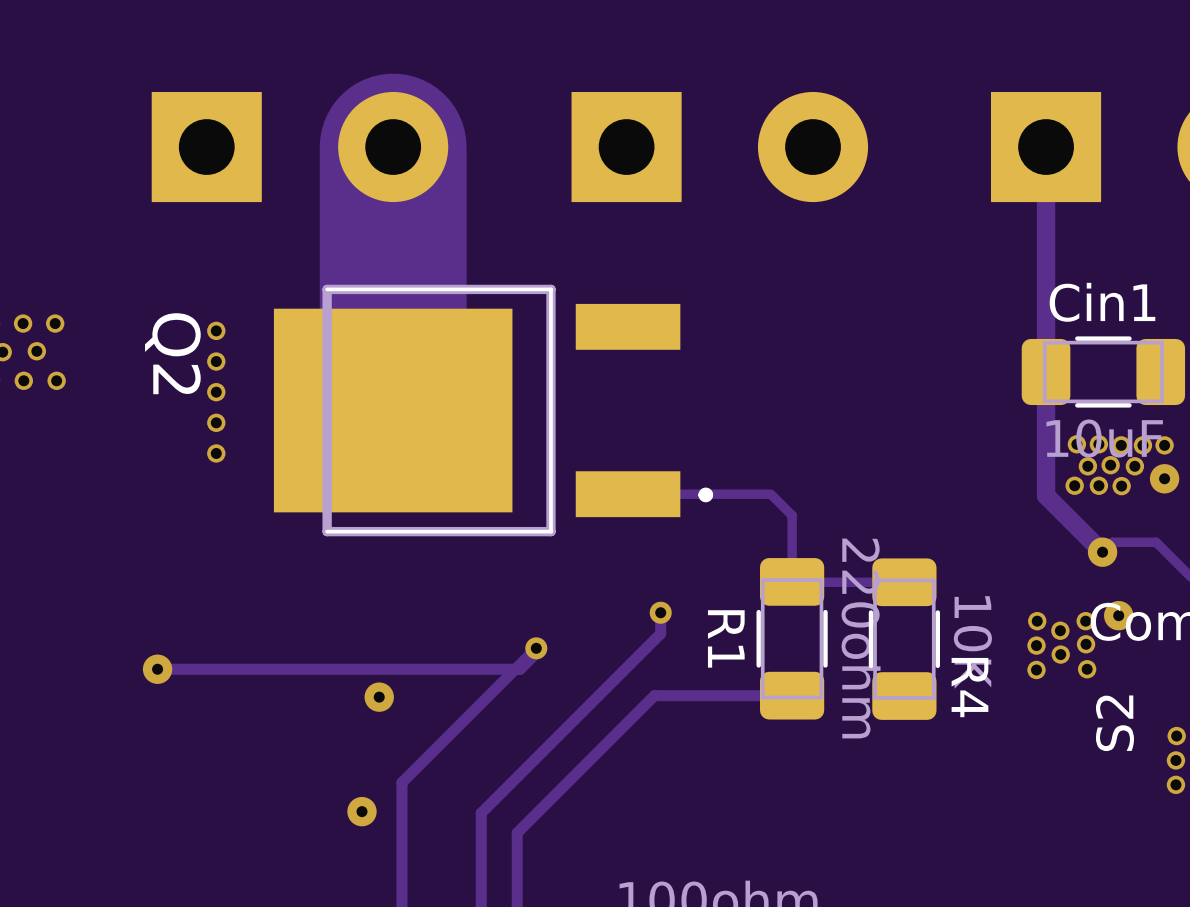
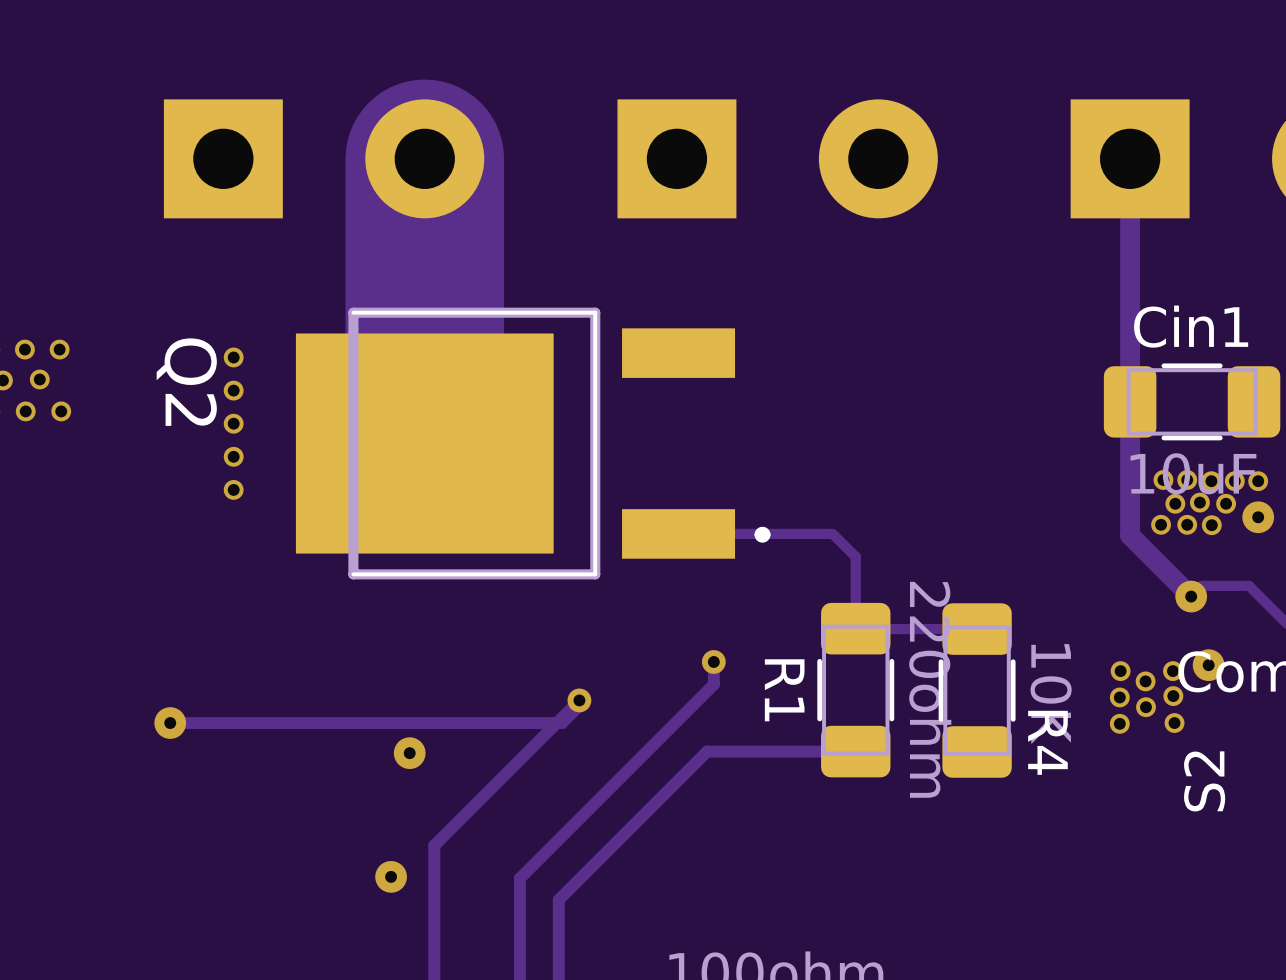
via: (1176, 736) -> none
via: (1175, 760) -> none
via: (1175, 784) -> none

